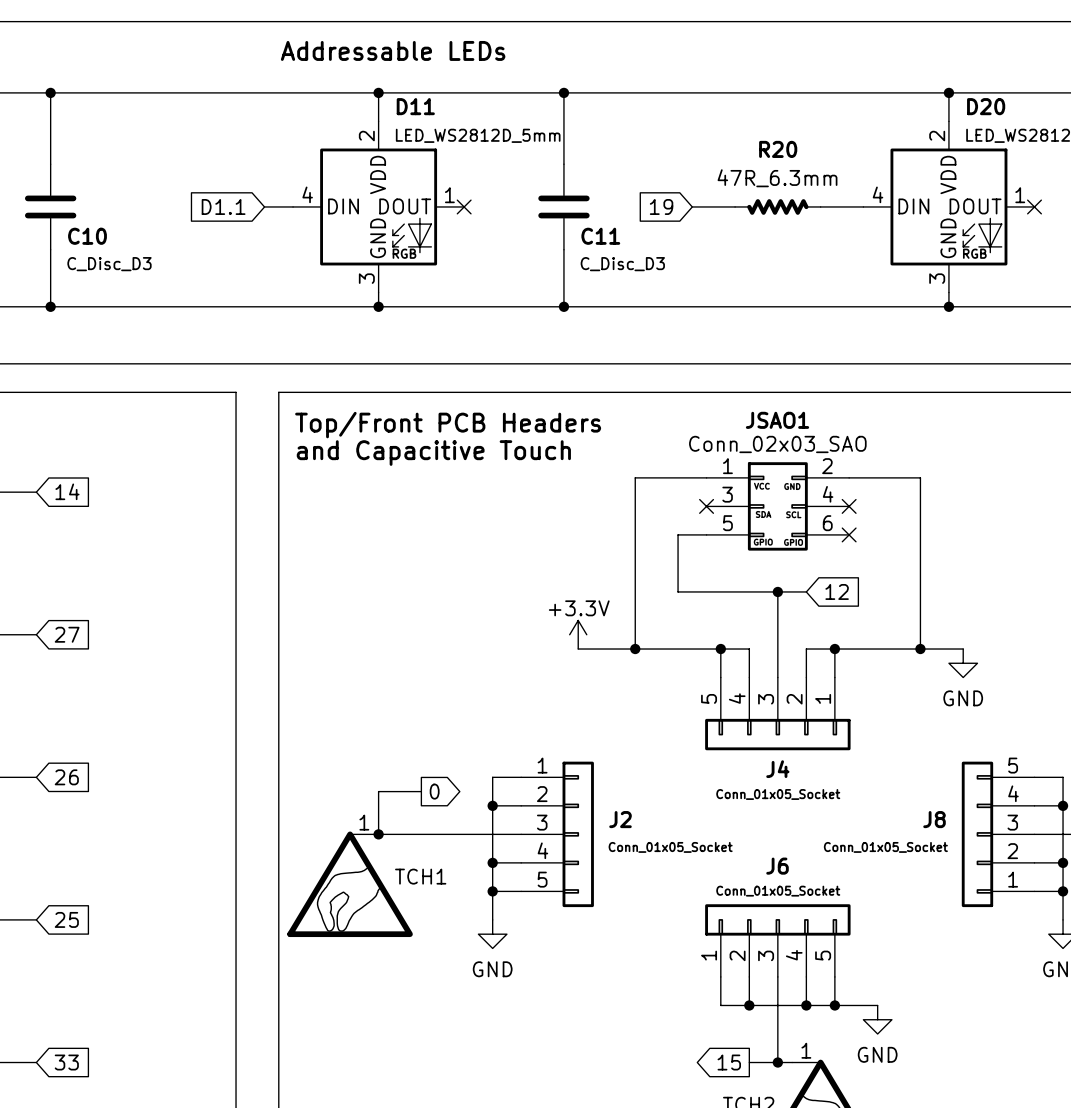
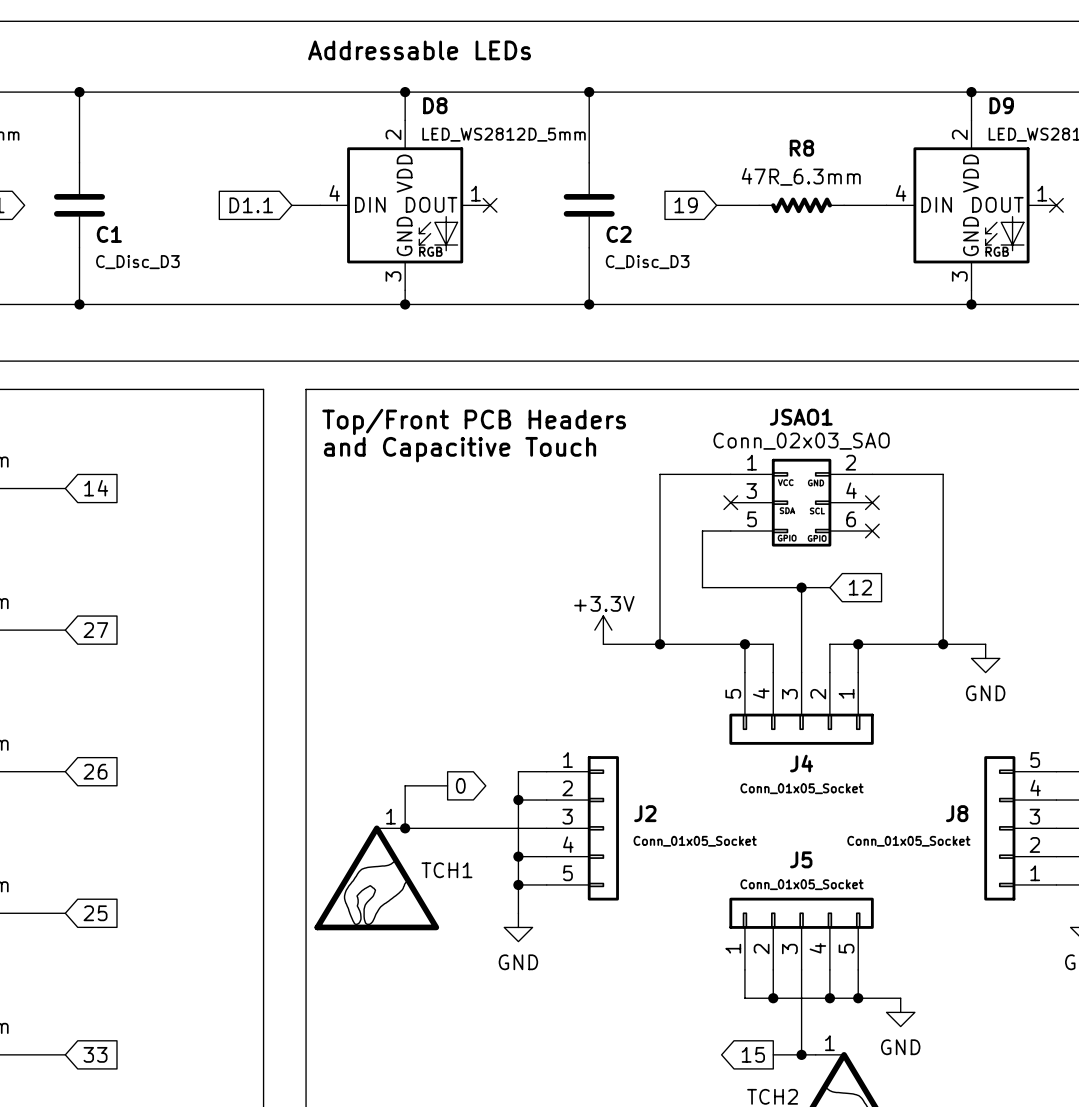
D11 name: D11 (415, 106) -> D8 (435, 105)
D20 name: D20 (986, 106) -> D9 (1001, 105)
R20 name: R20 (778, 149) -> R8 (801, 148)
C10 name: C10 (87, 236) -> C1 (109, 234)
C11 name: C11 (600, 236) -> C2 (619, 234)
J6 name: J6 (777, 866) -> J5 (801, 859)

